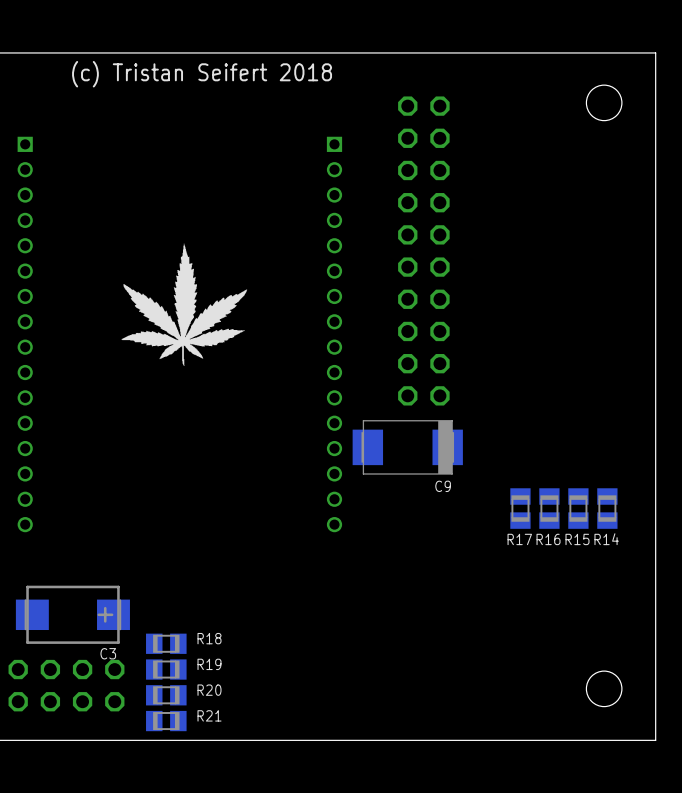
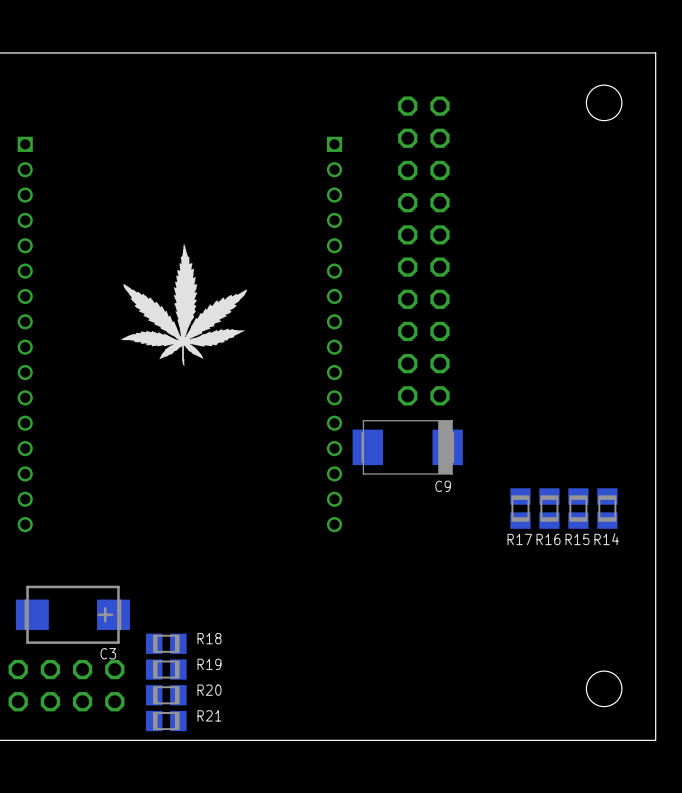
text: (c) Tristan Seifert 2018 (202, 74) -> none

